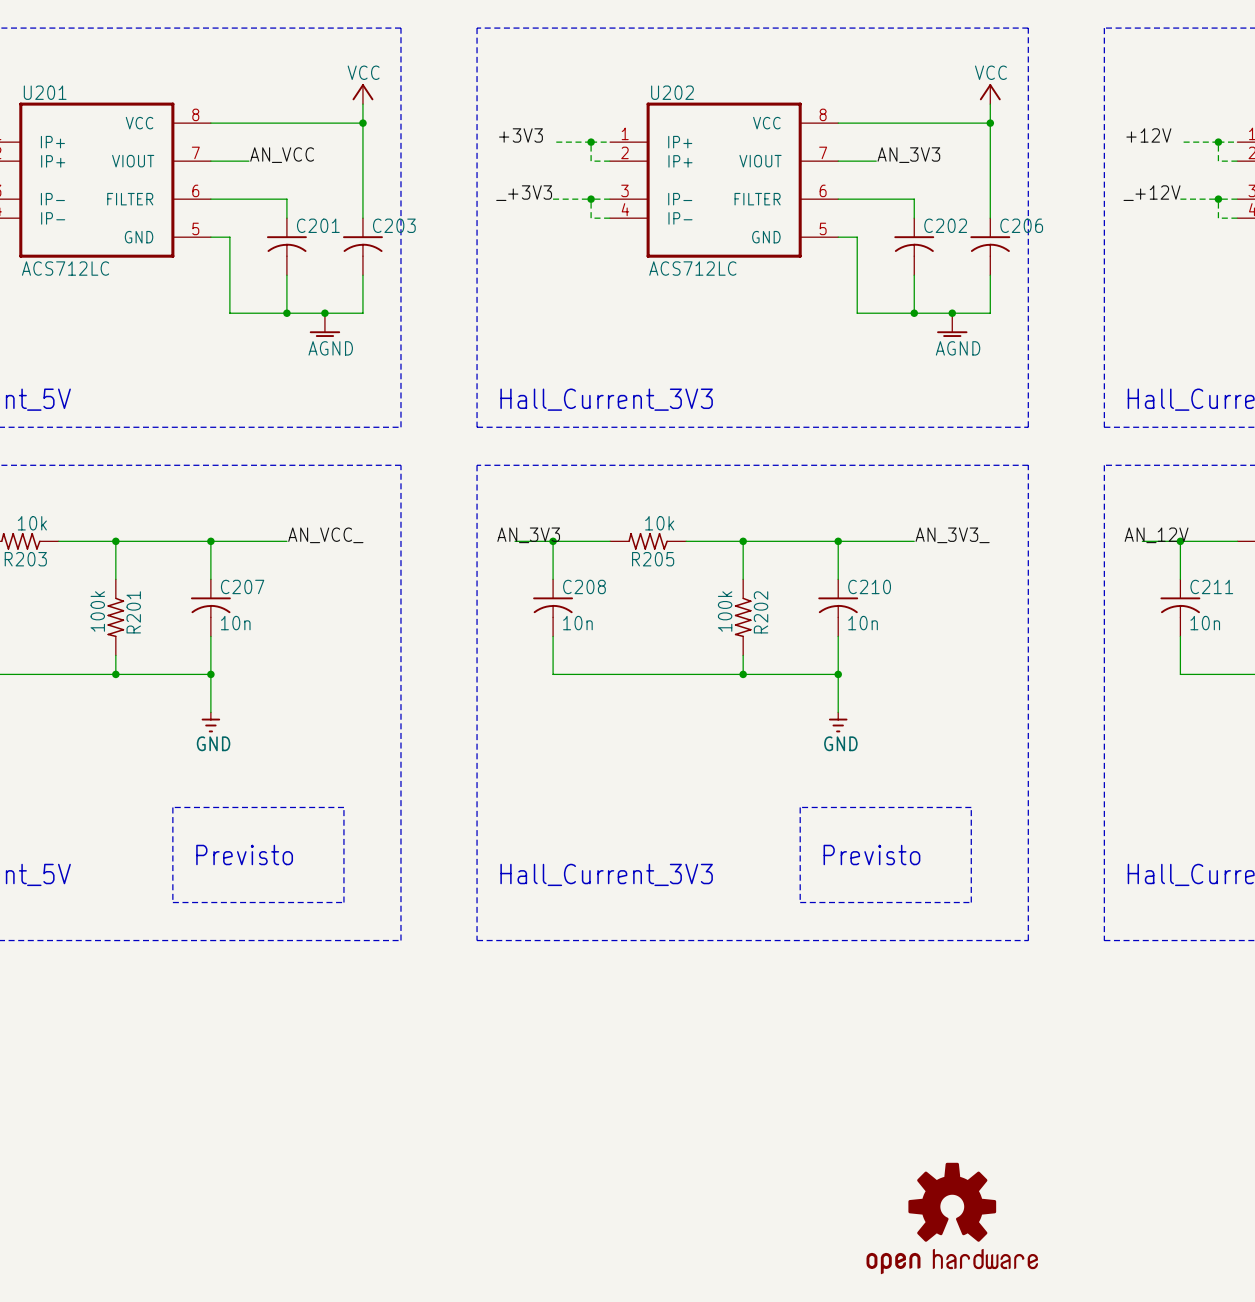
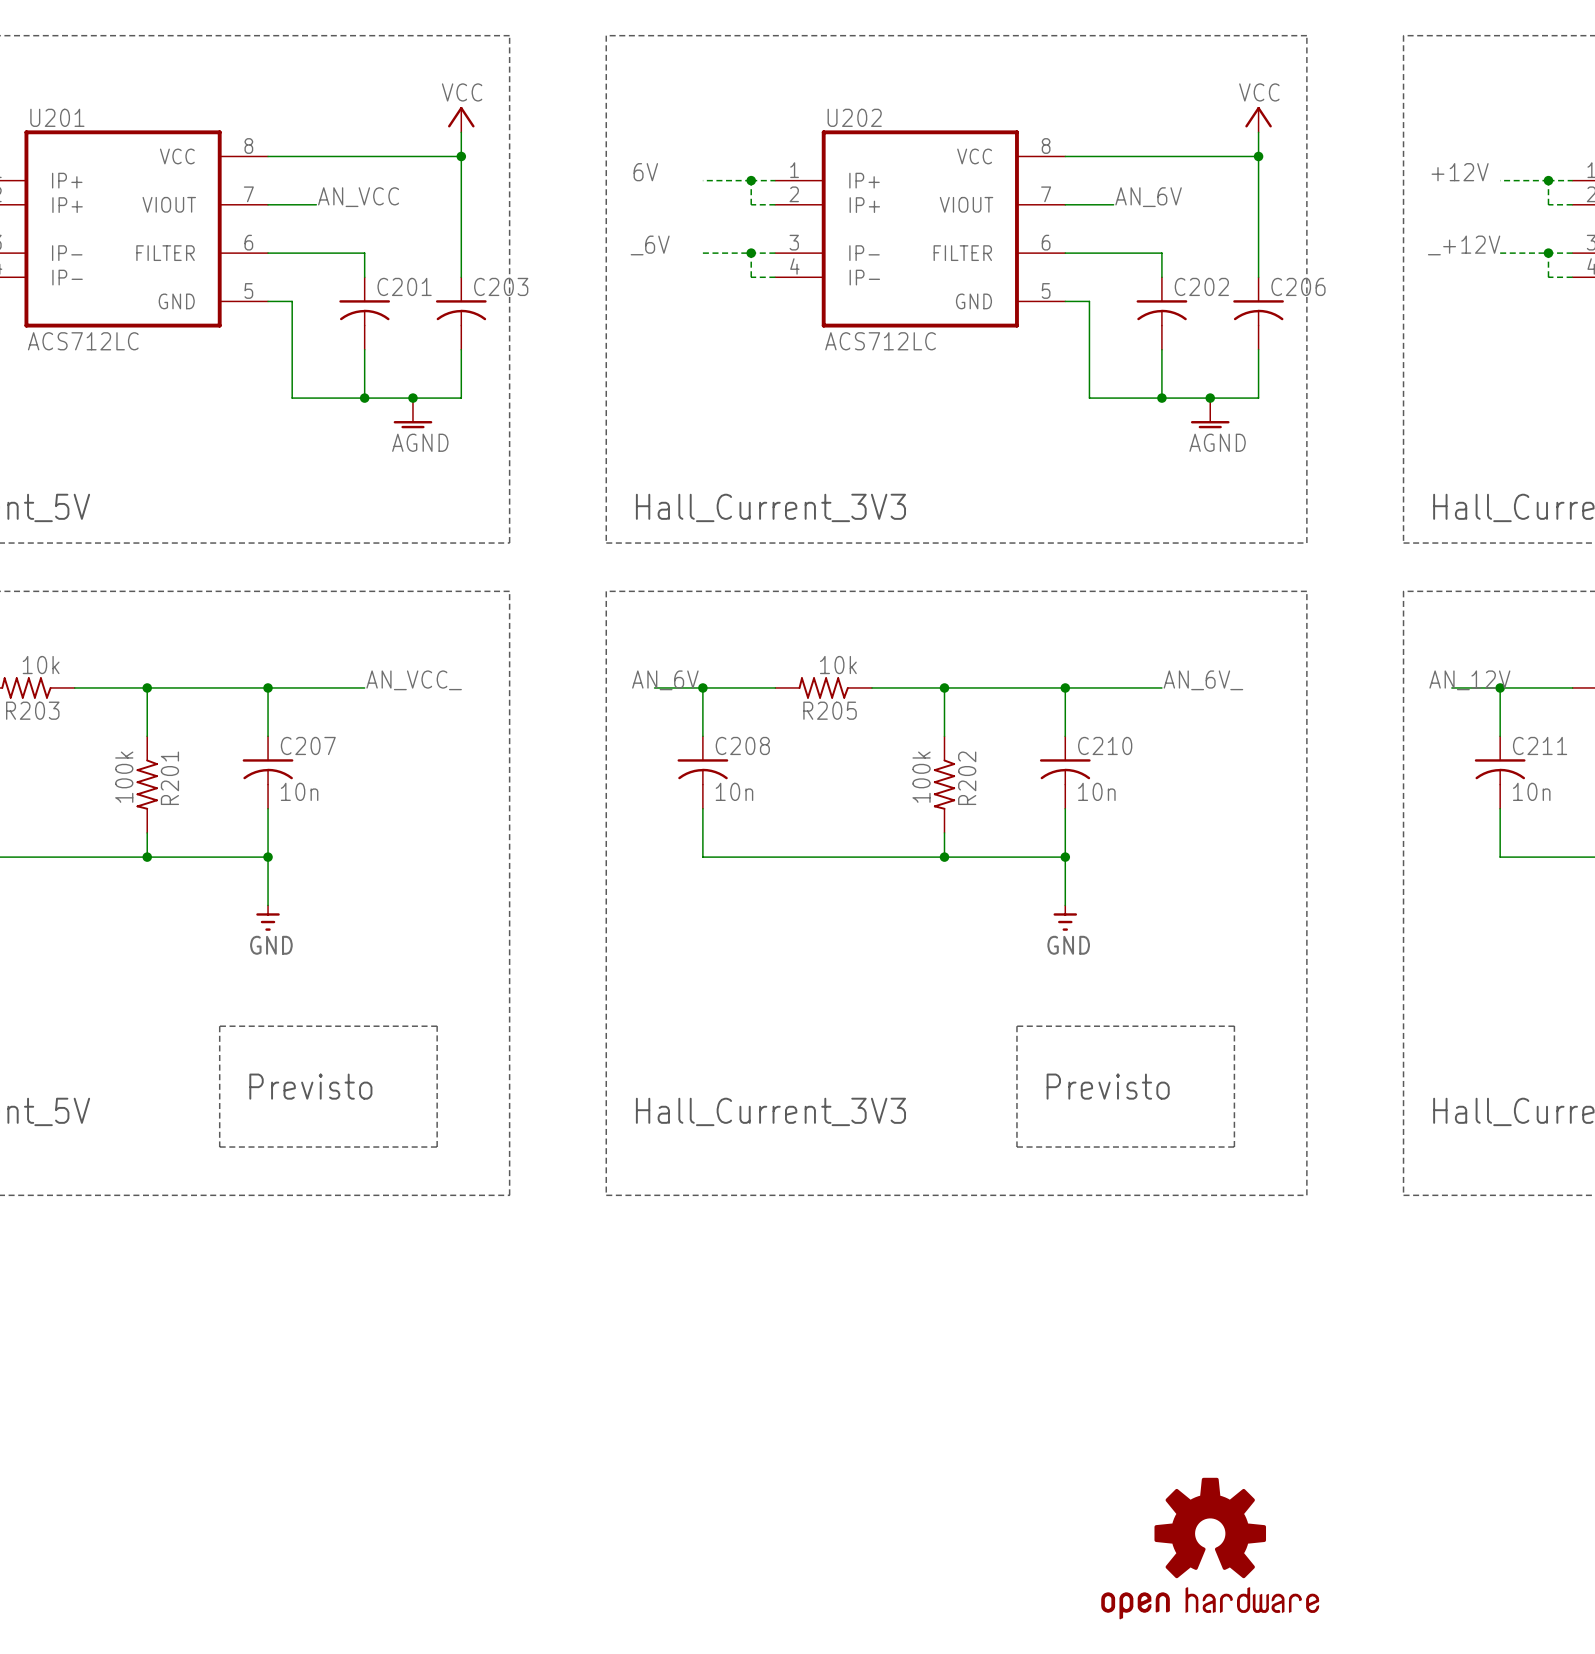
label: +3V3 (520, 135) -> 6V (645, 172)
label: AN_3V3 (908, 155) -> AN_6V (1148, 197)
label: _+3V3 (524, 193) -> _6V (650, 245)
label: AN_3V3 (528, 535) -> AN_6V (665, 680)
label: AN_3V3_ (952, 535) -> AN_6V_ (1203, 680)

